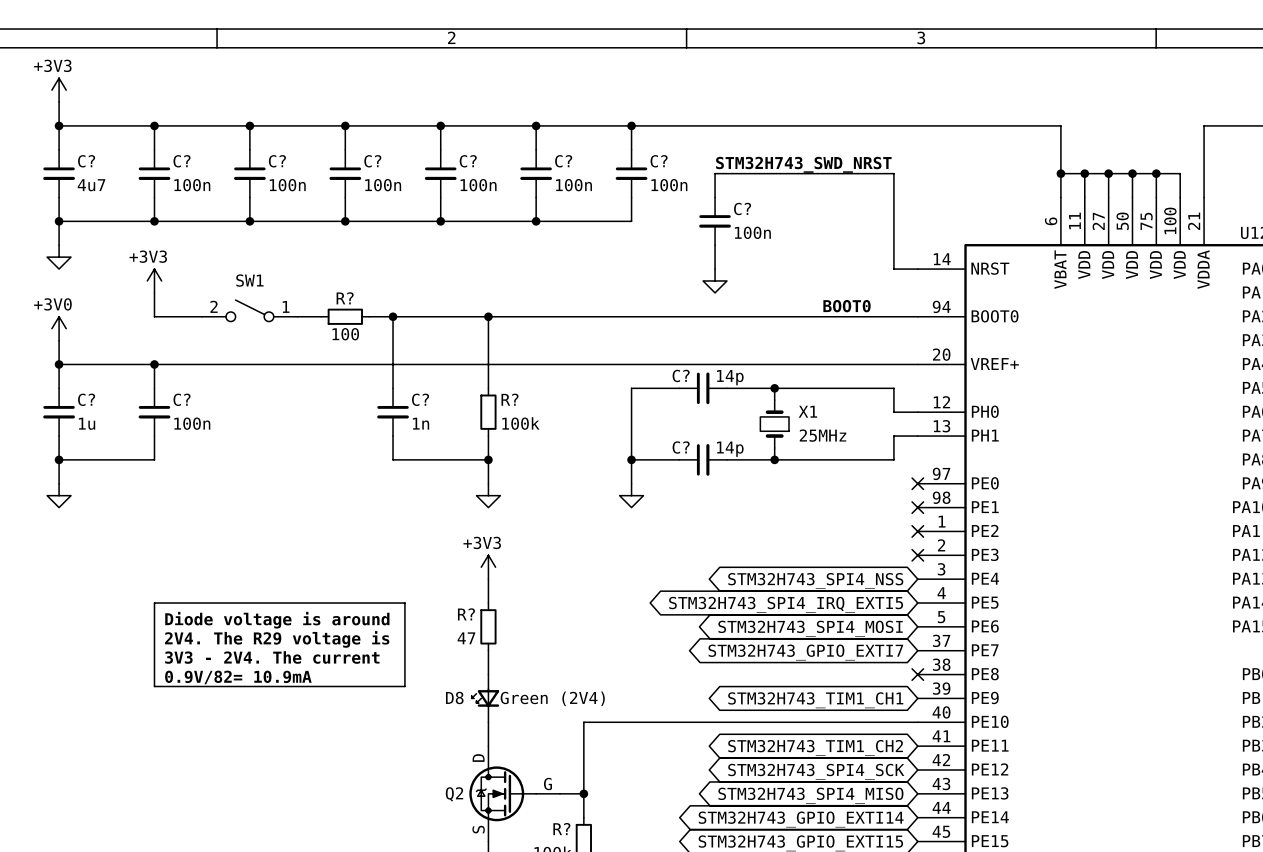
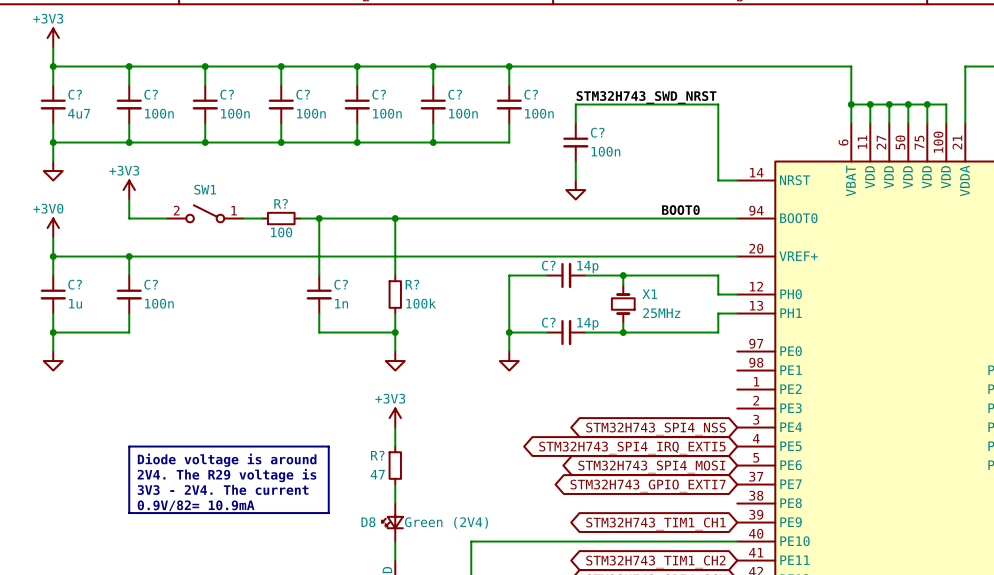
no-connect mark: (917, 483) -> none
no-connect mark: (917, 507) -> none
no-connect mark: (917, 531) -> none
no-connect mark: (917, 555) -> none
no-connect mark: (917, 674) -> none

